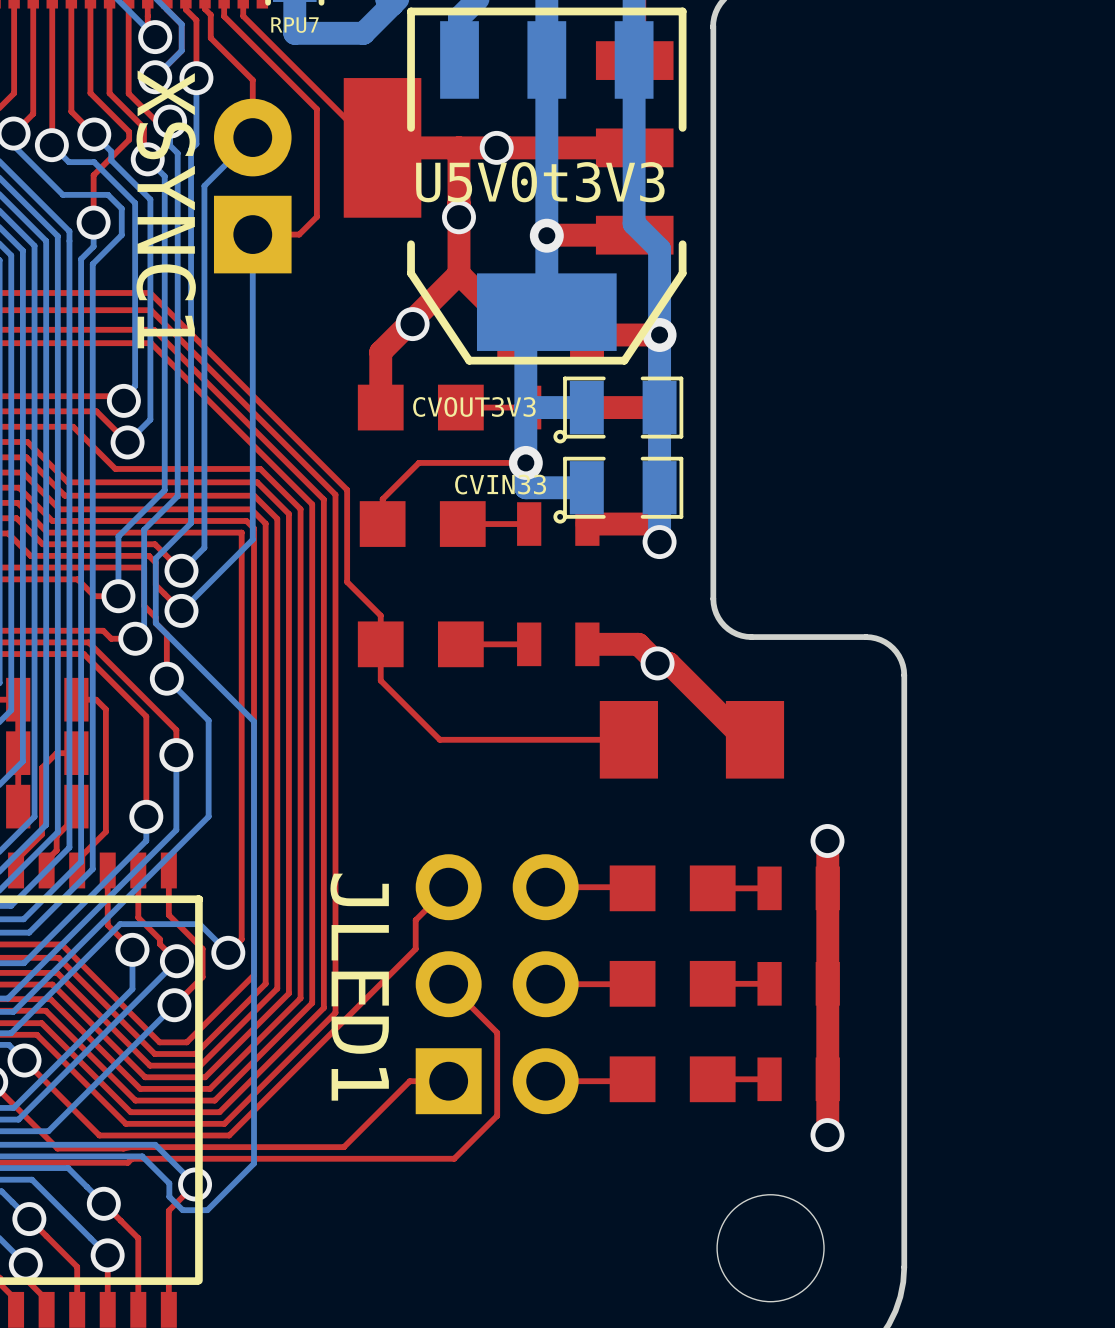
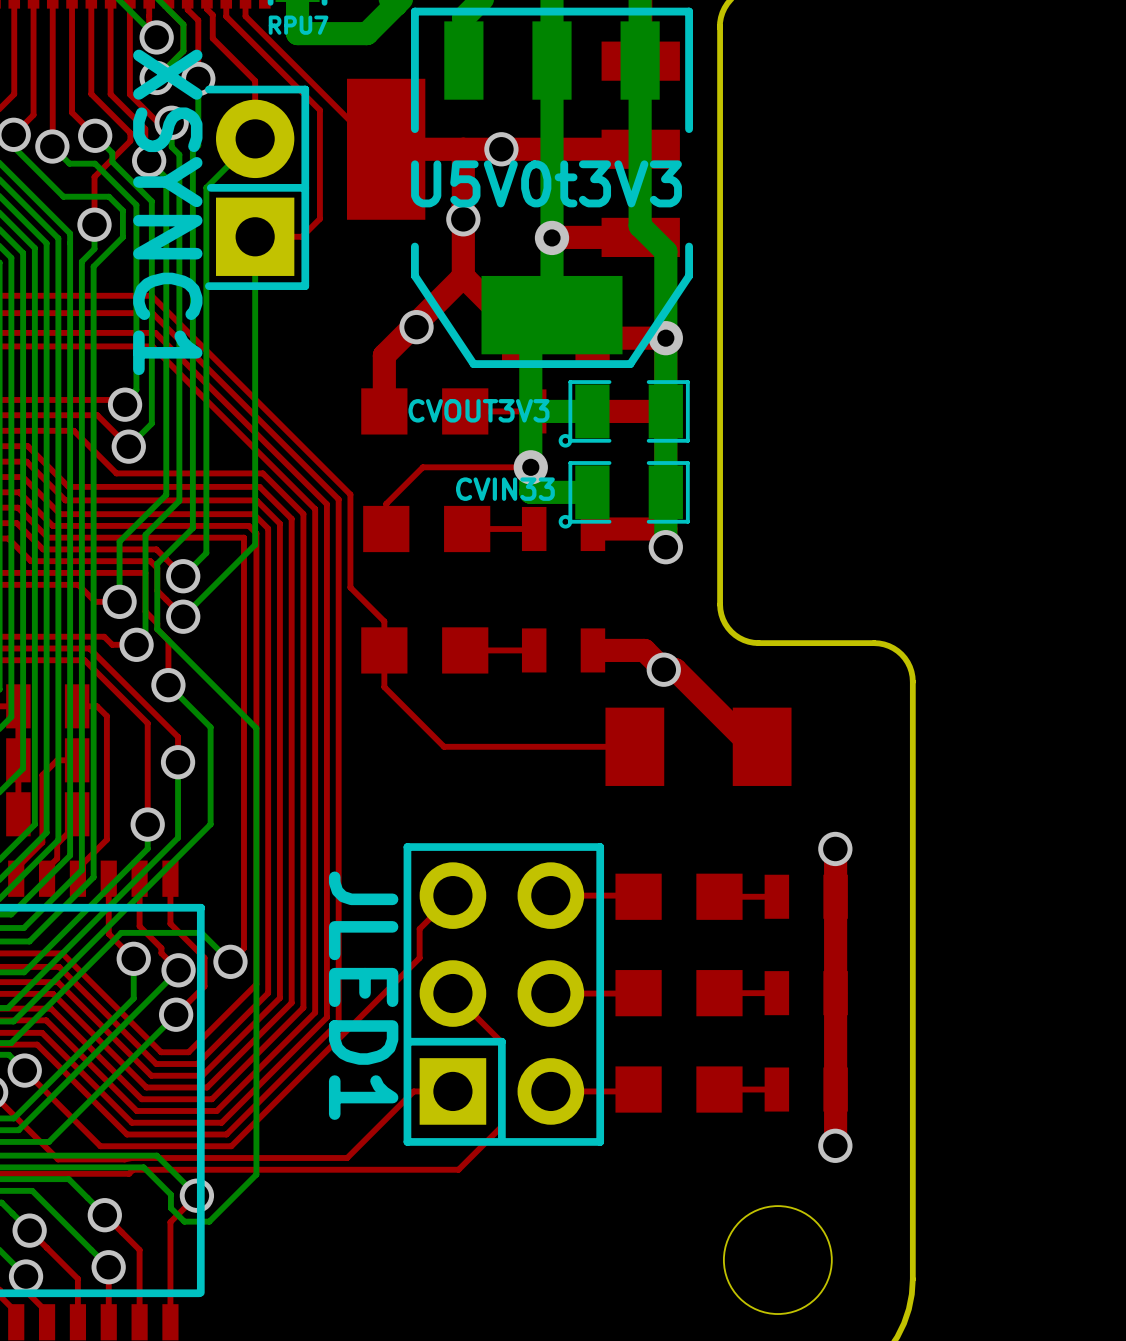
line: none -> (208, 89) (305, 89) (305, 286) (208, 286)
line: none -> (305, 187) (210, 187)
line: none -> (600, 847) (407, 847) (407, 1141) (600, 1141) (600, 847)
line: none -> (409, 1041) (501, 1041) (501, 1140)

